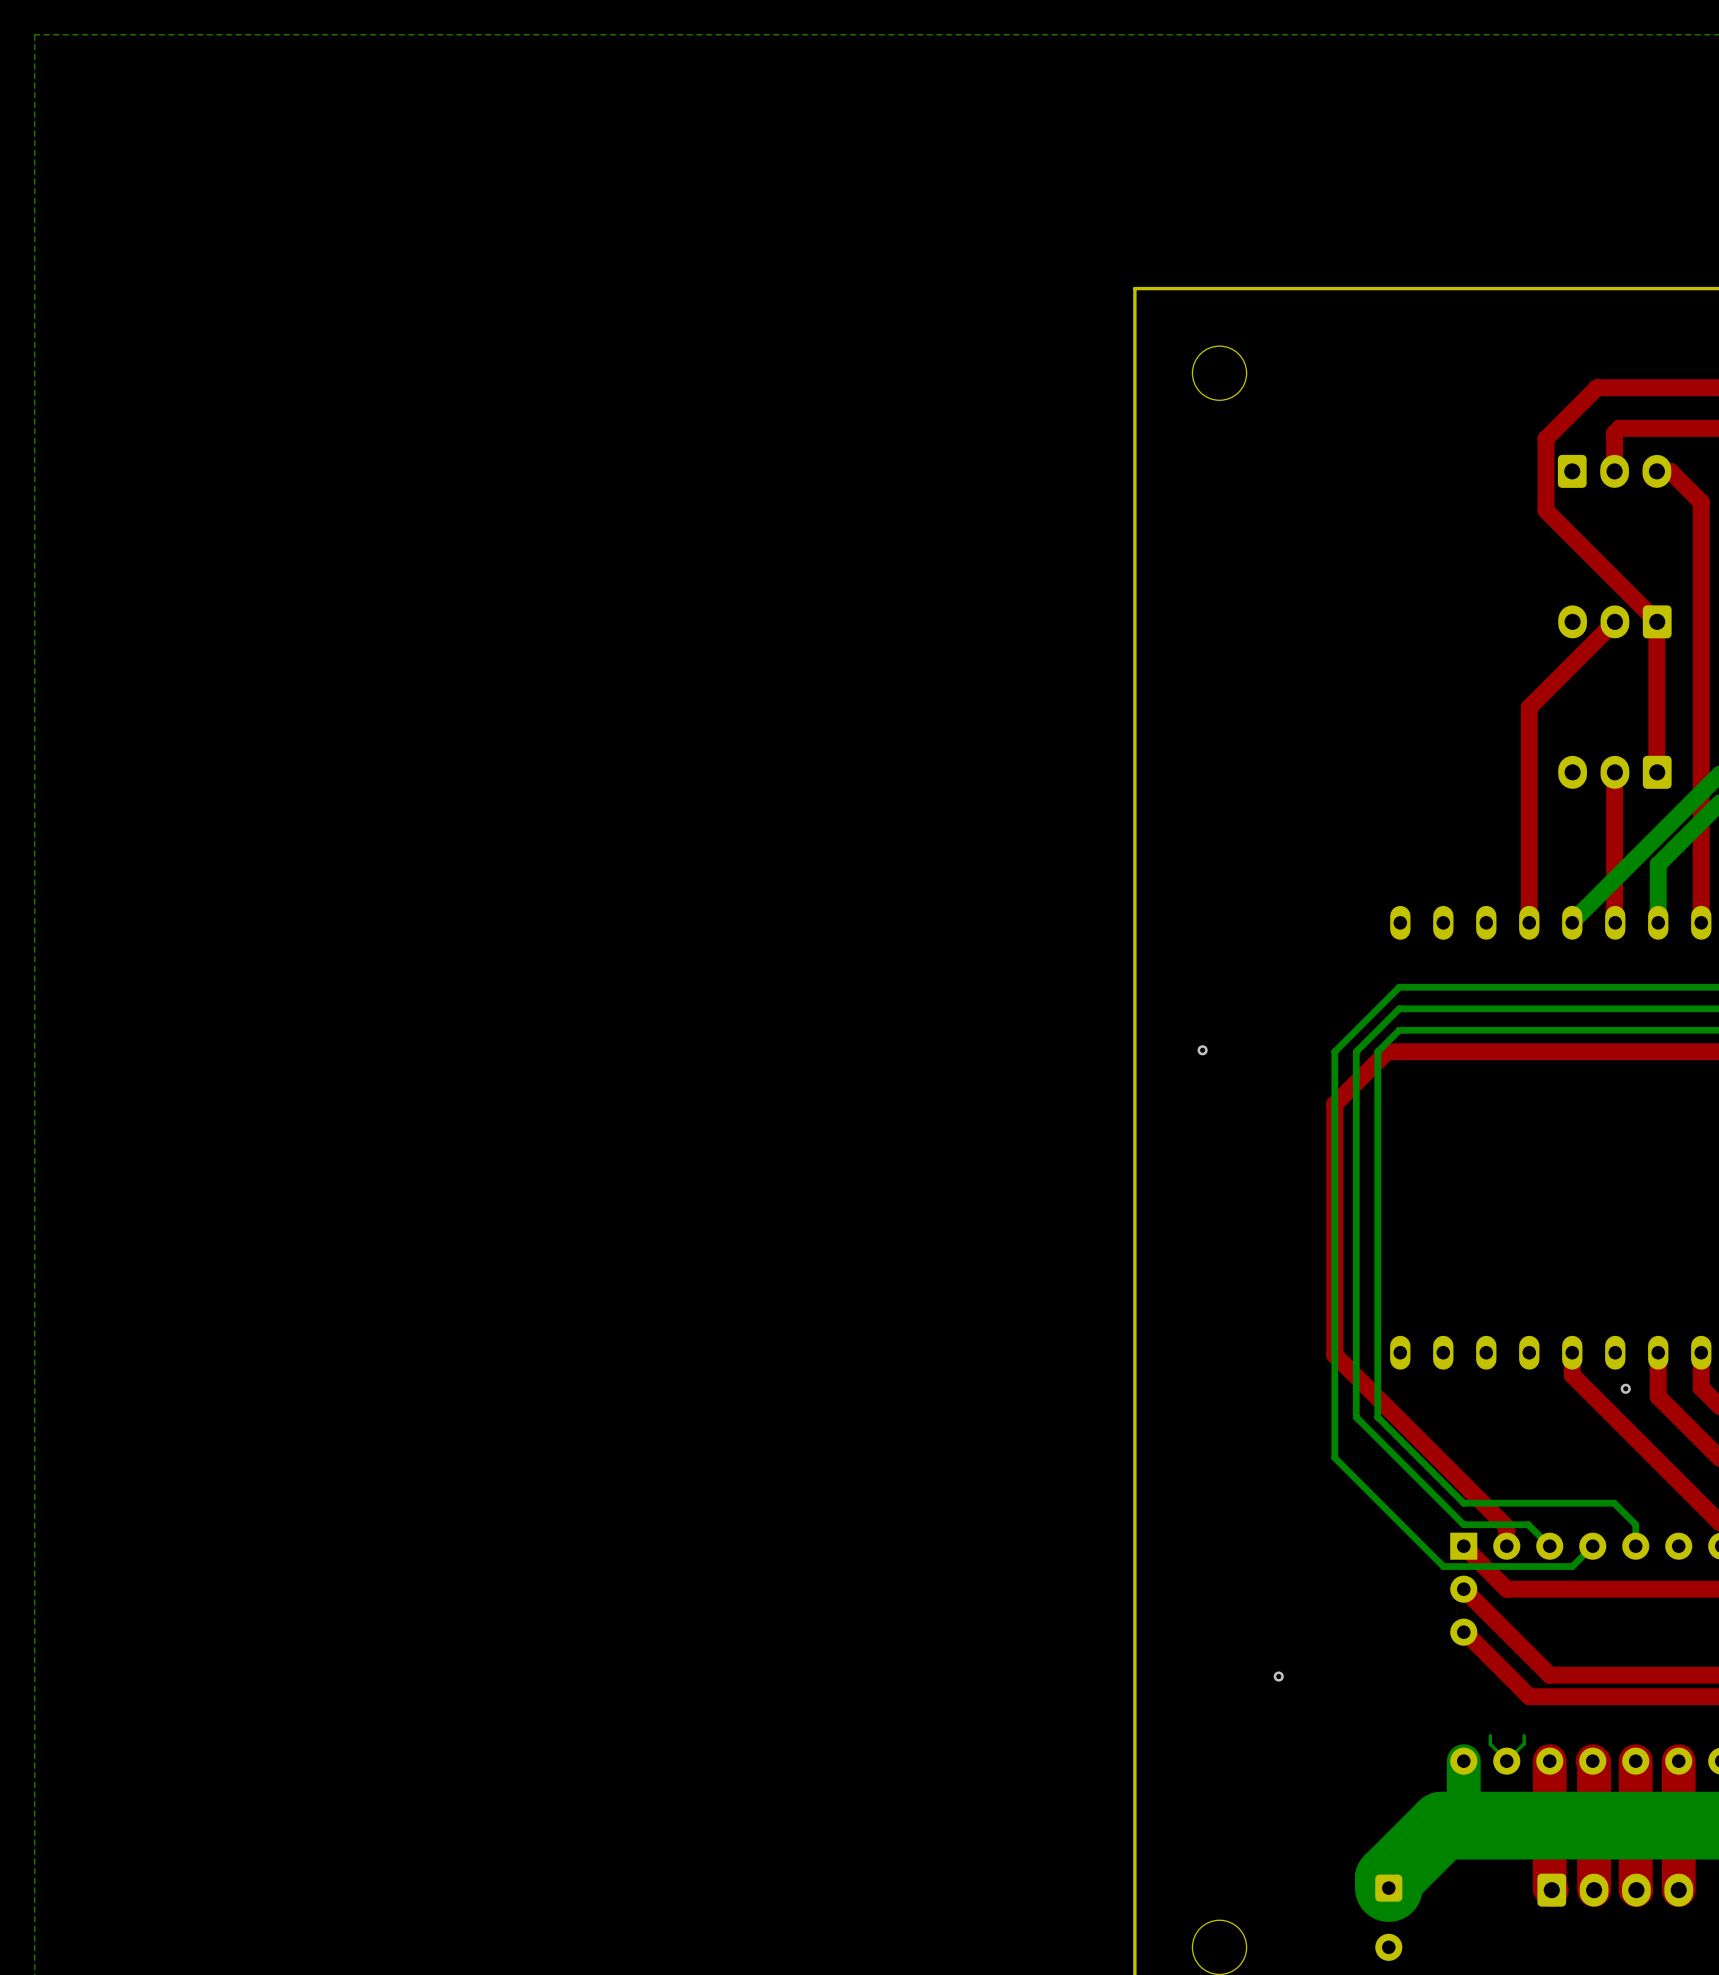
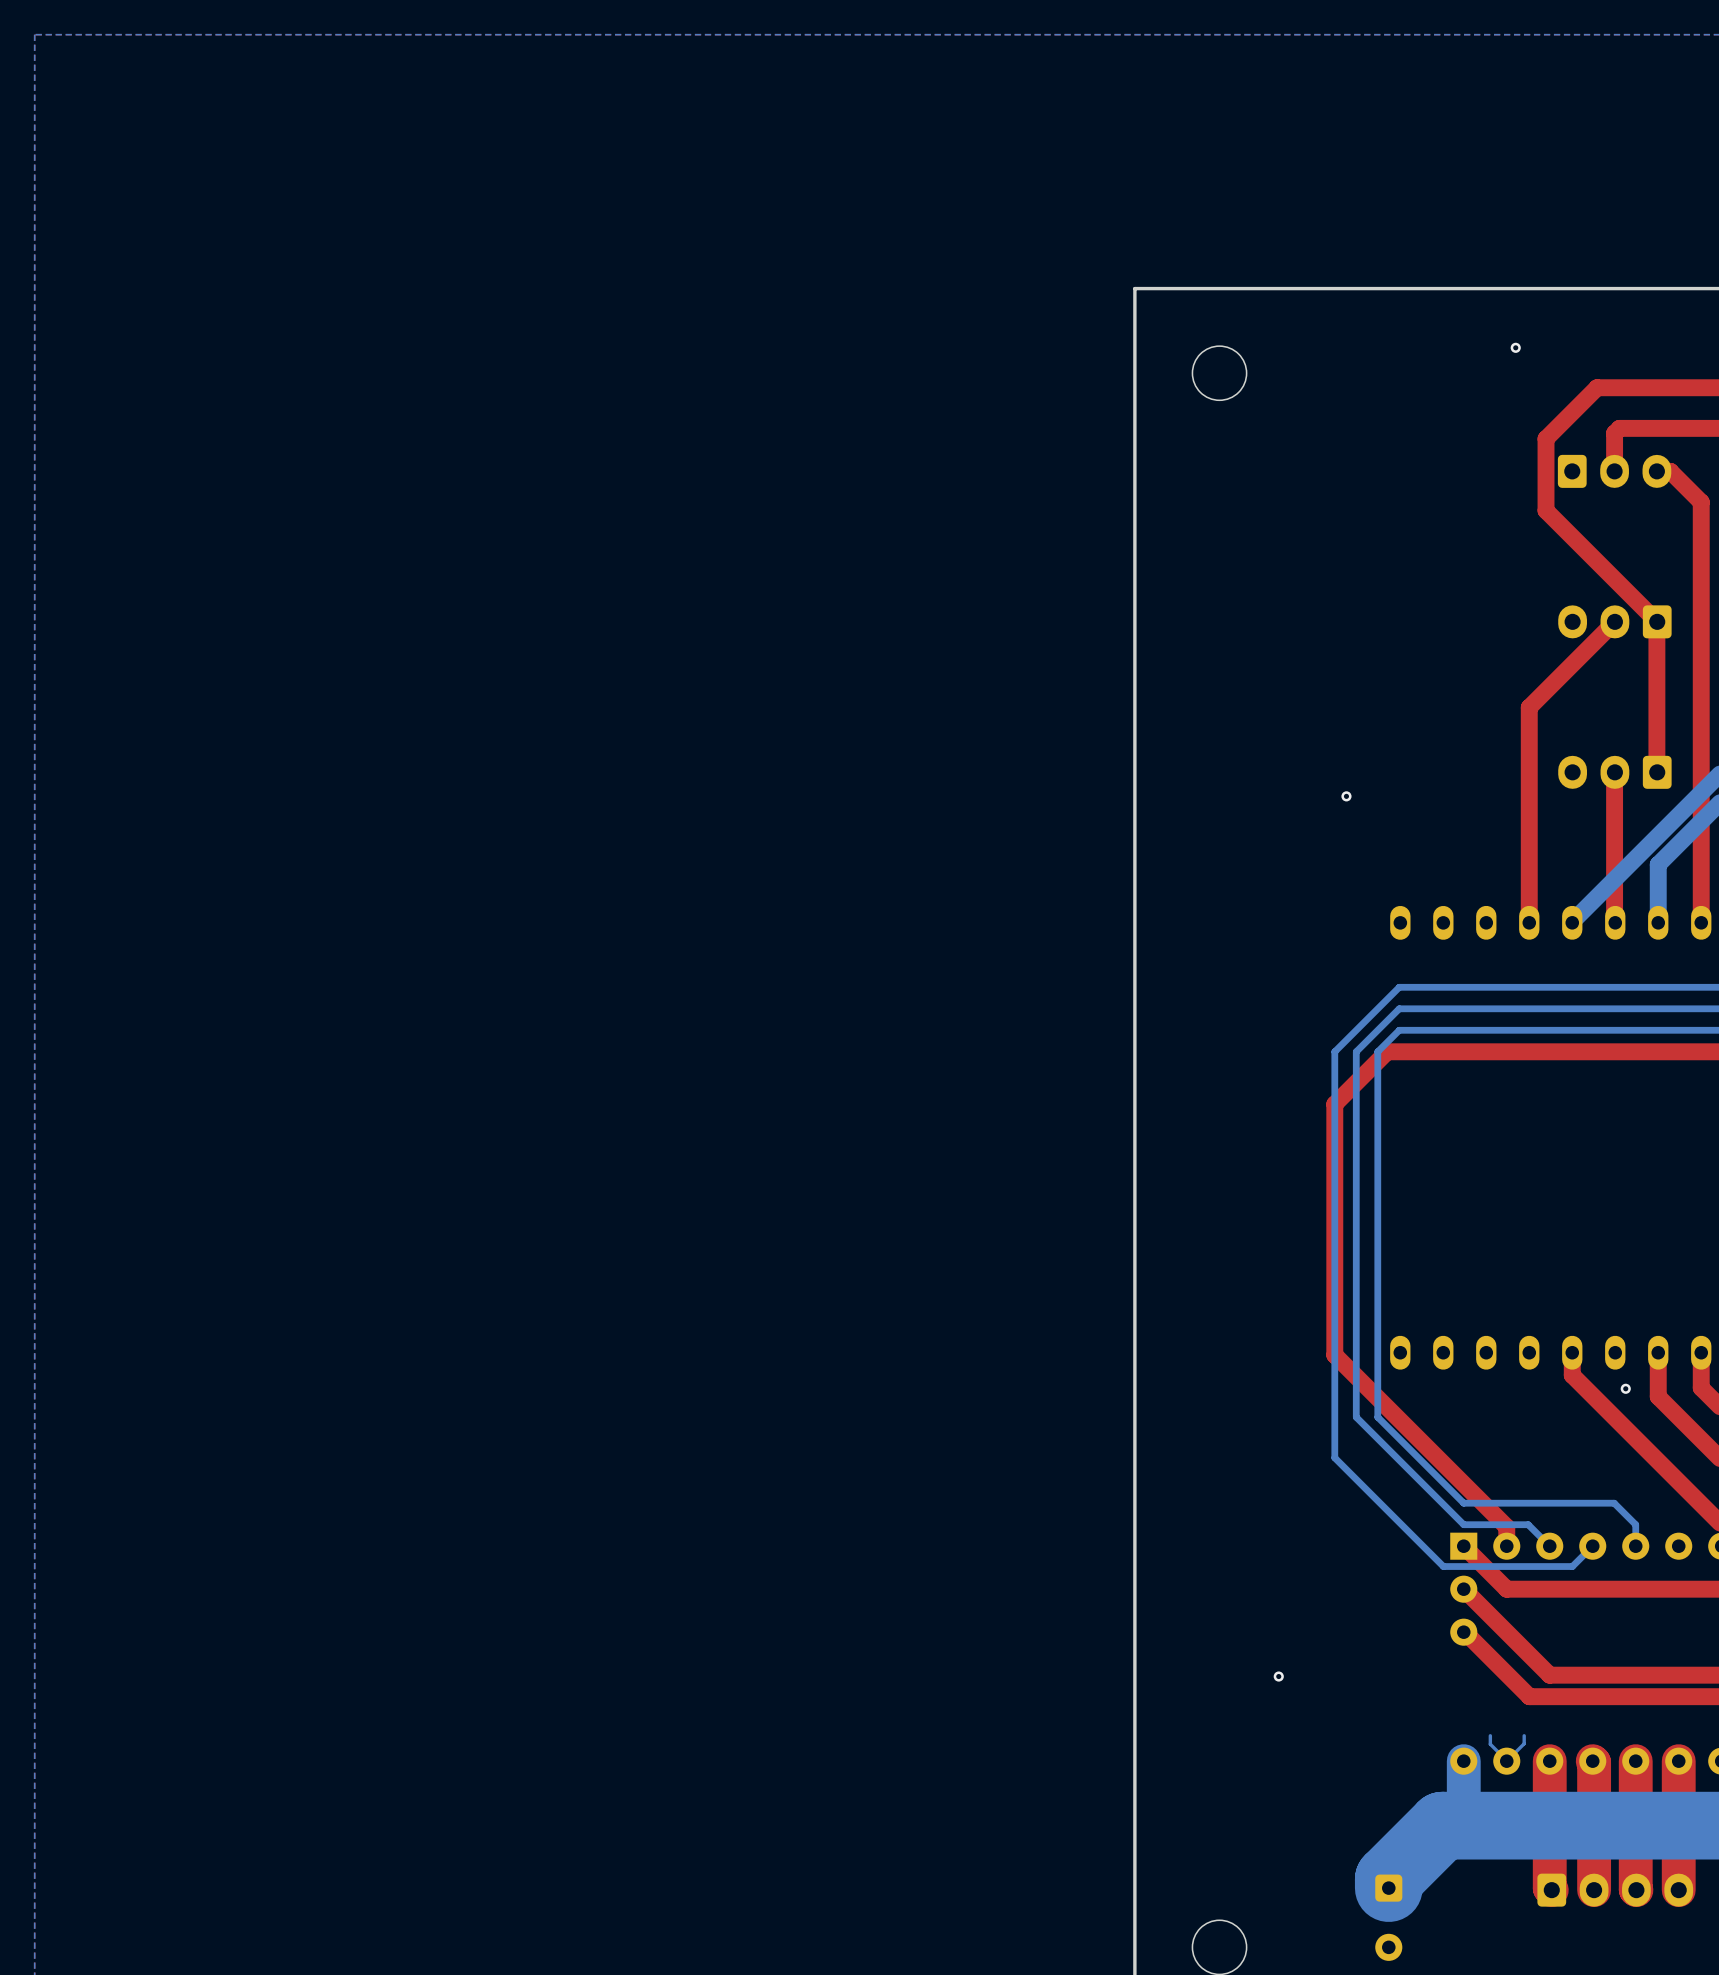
via: none -> (1515, 347)
via: none -> (1346, 796)
via: (1202, 1050) -> none

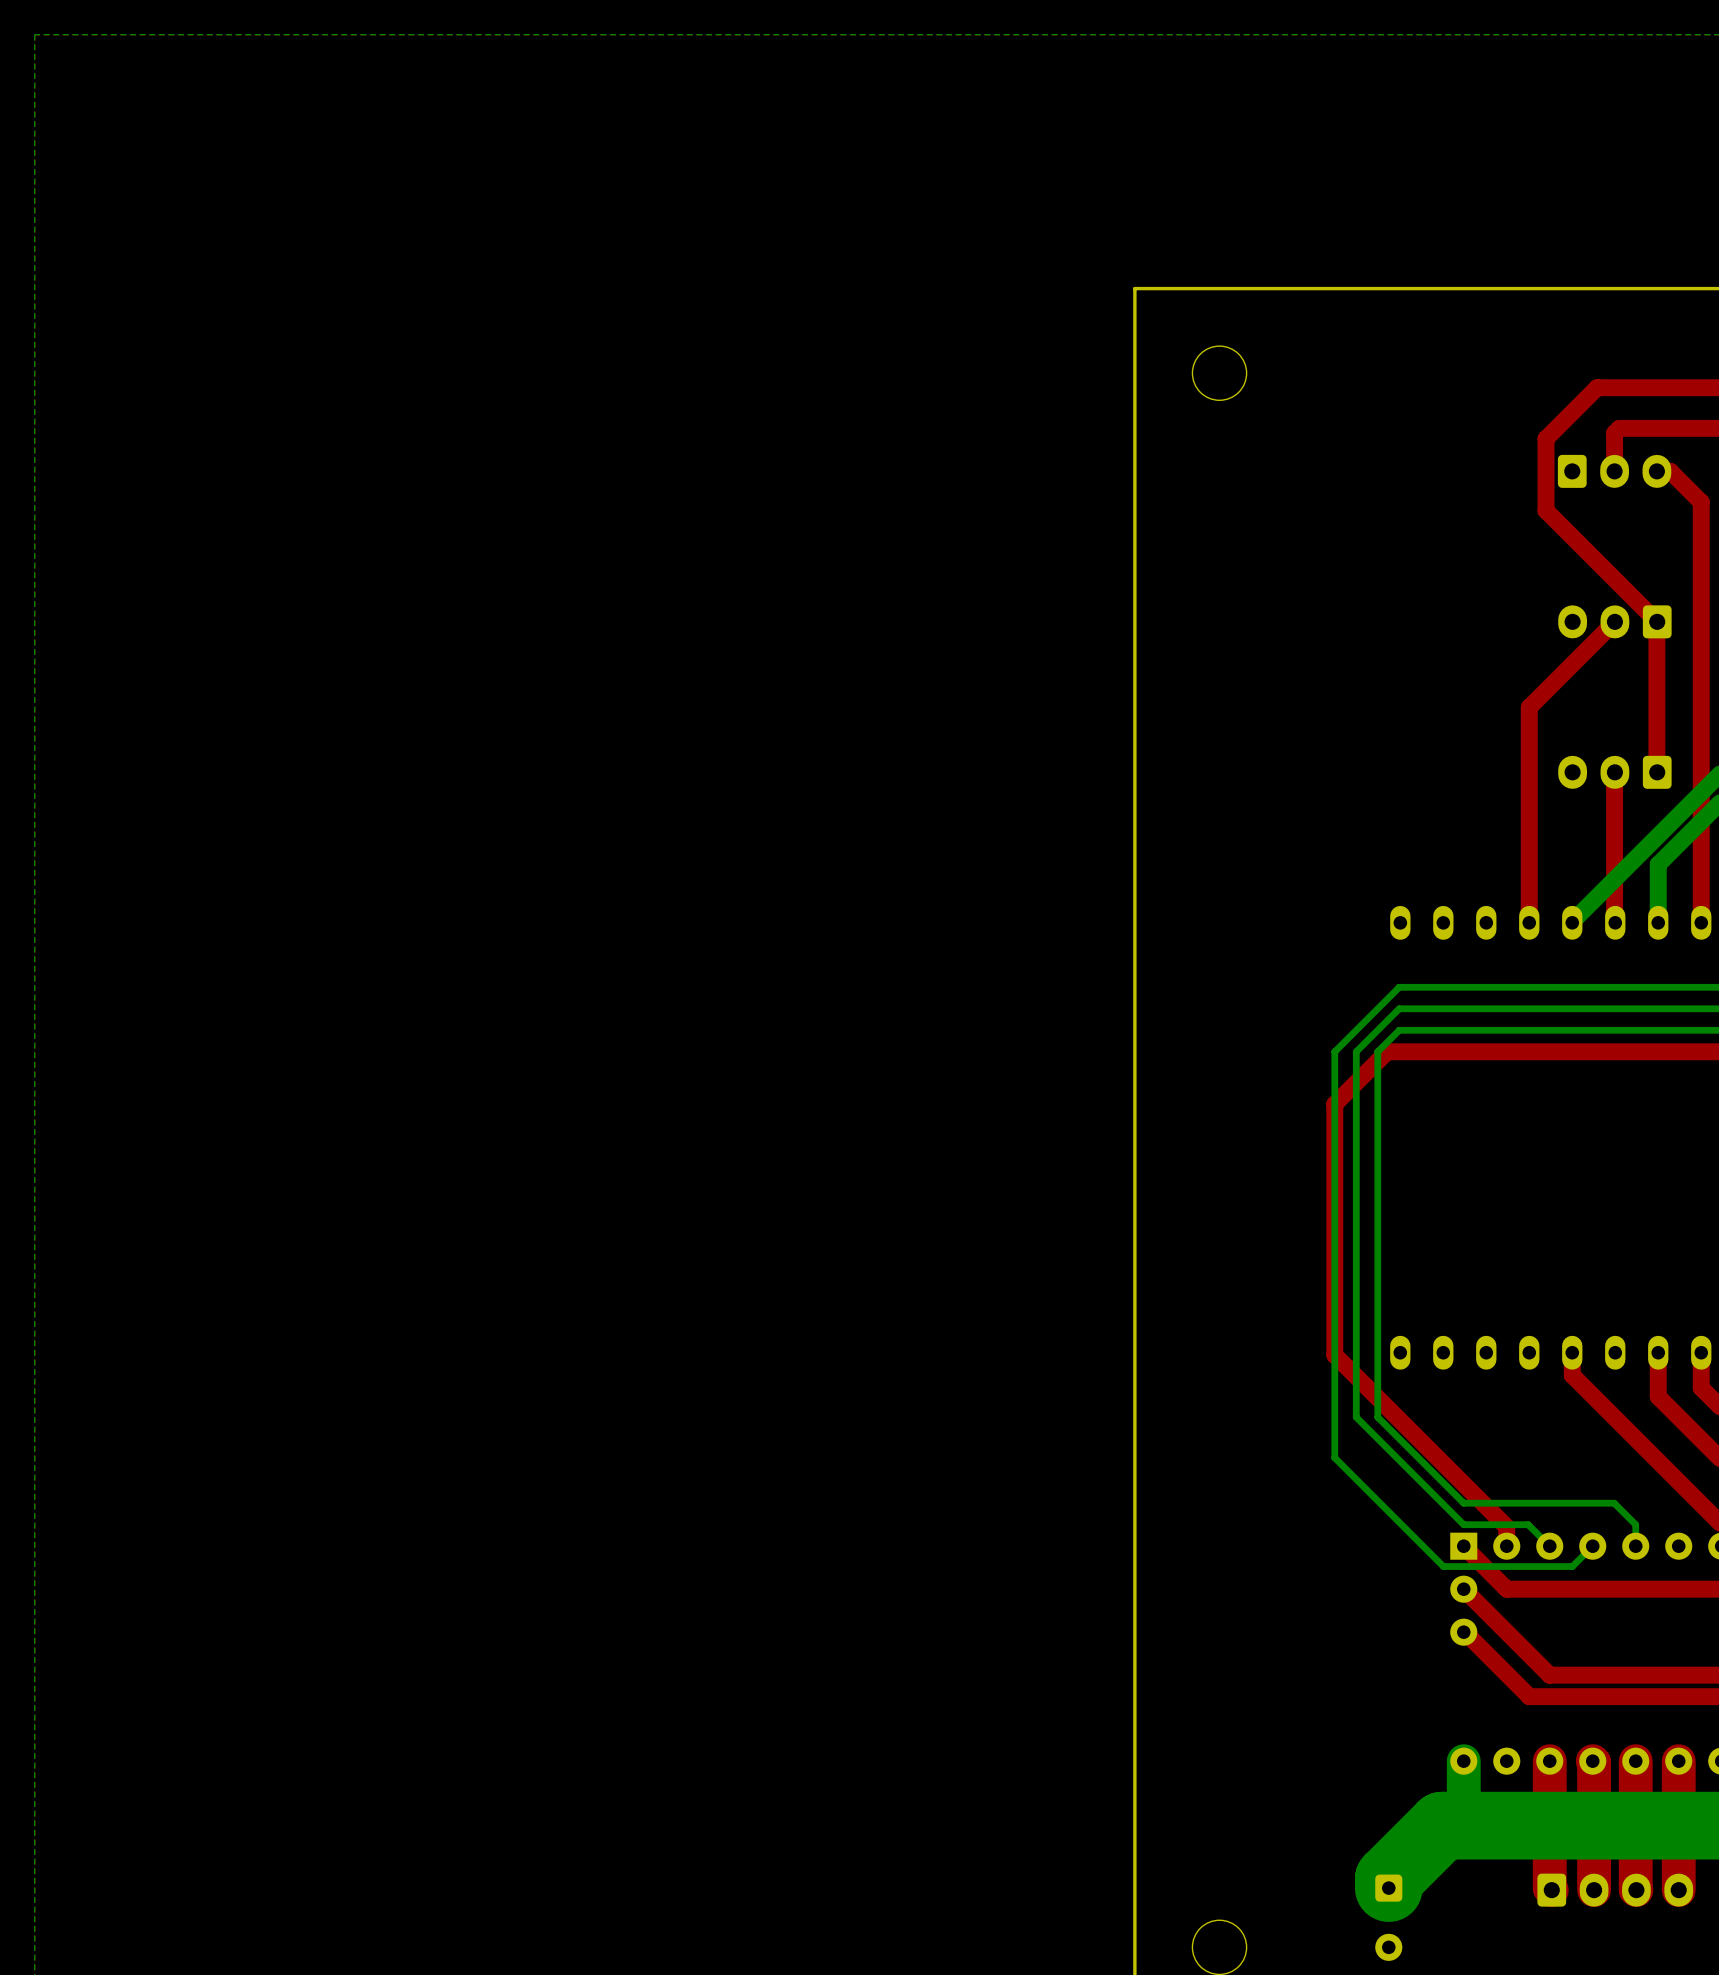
via: (1515, 347) -> none
via: (1346, 796) -> none
via: (1625, 1388) -> none
via: (1278, 1676) -> none
bottom track: (1524, 1735) (1524, 1743) (1506, 1761) (1490, 1744) (1490, 1735) -> none

